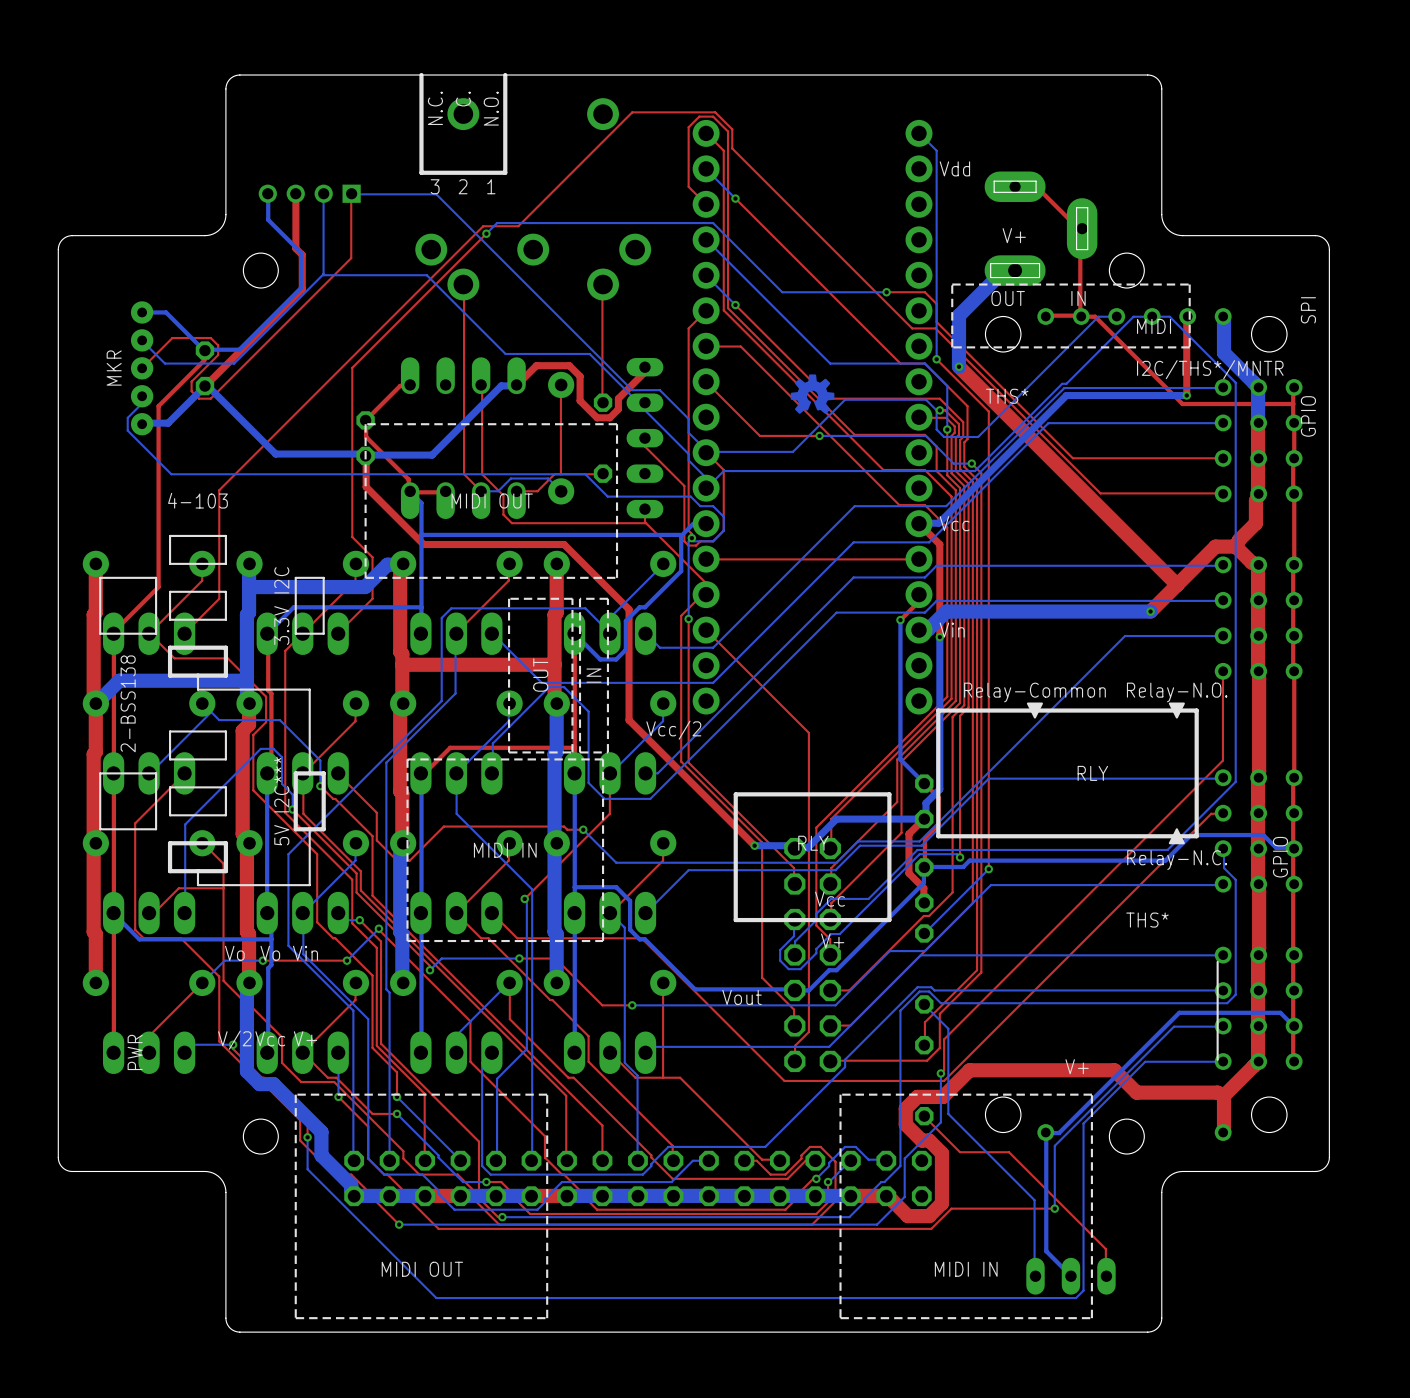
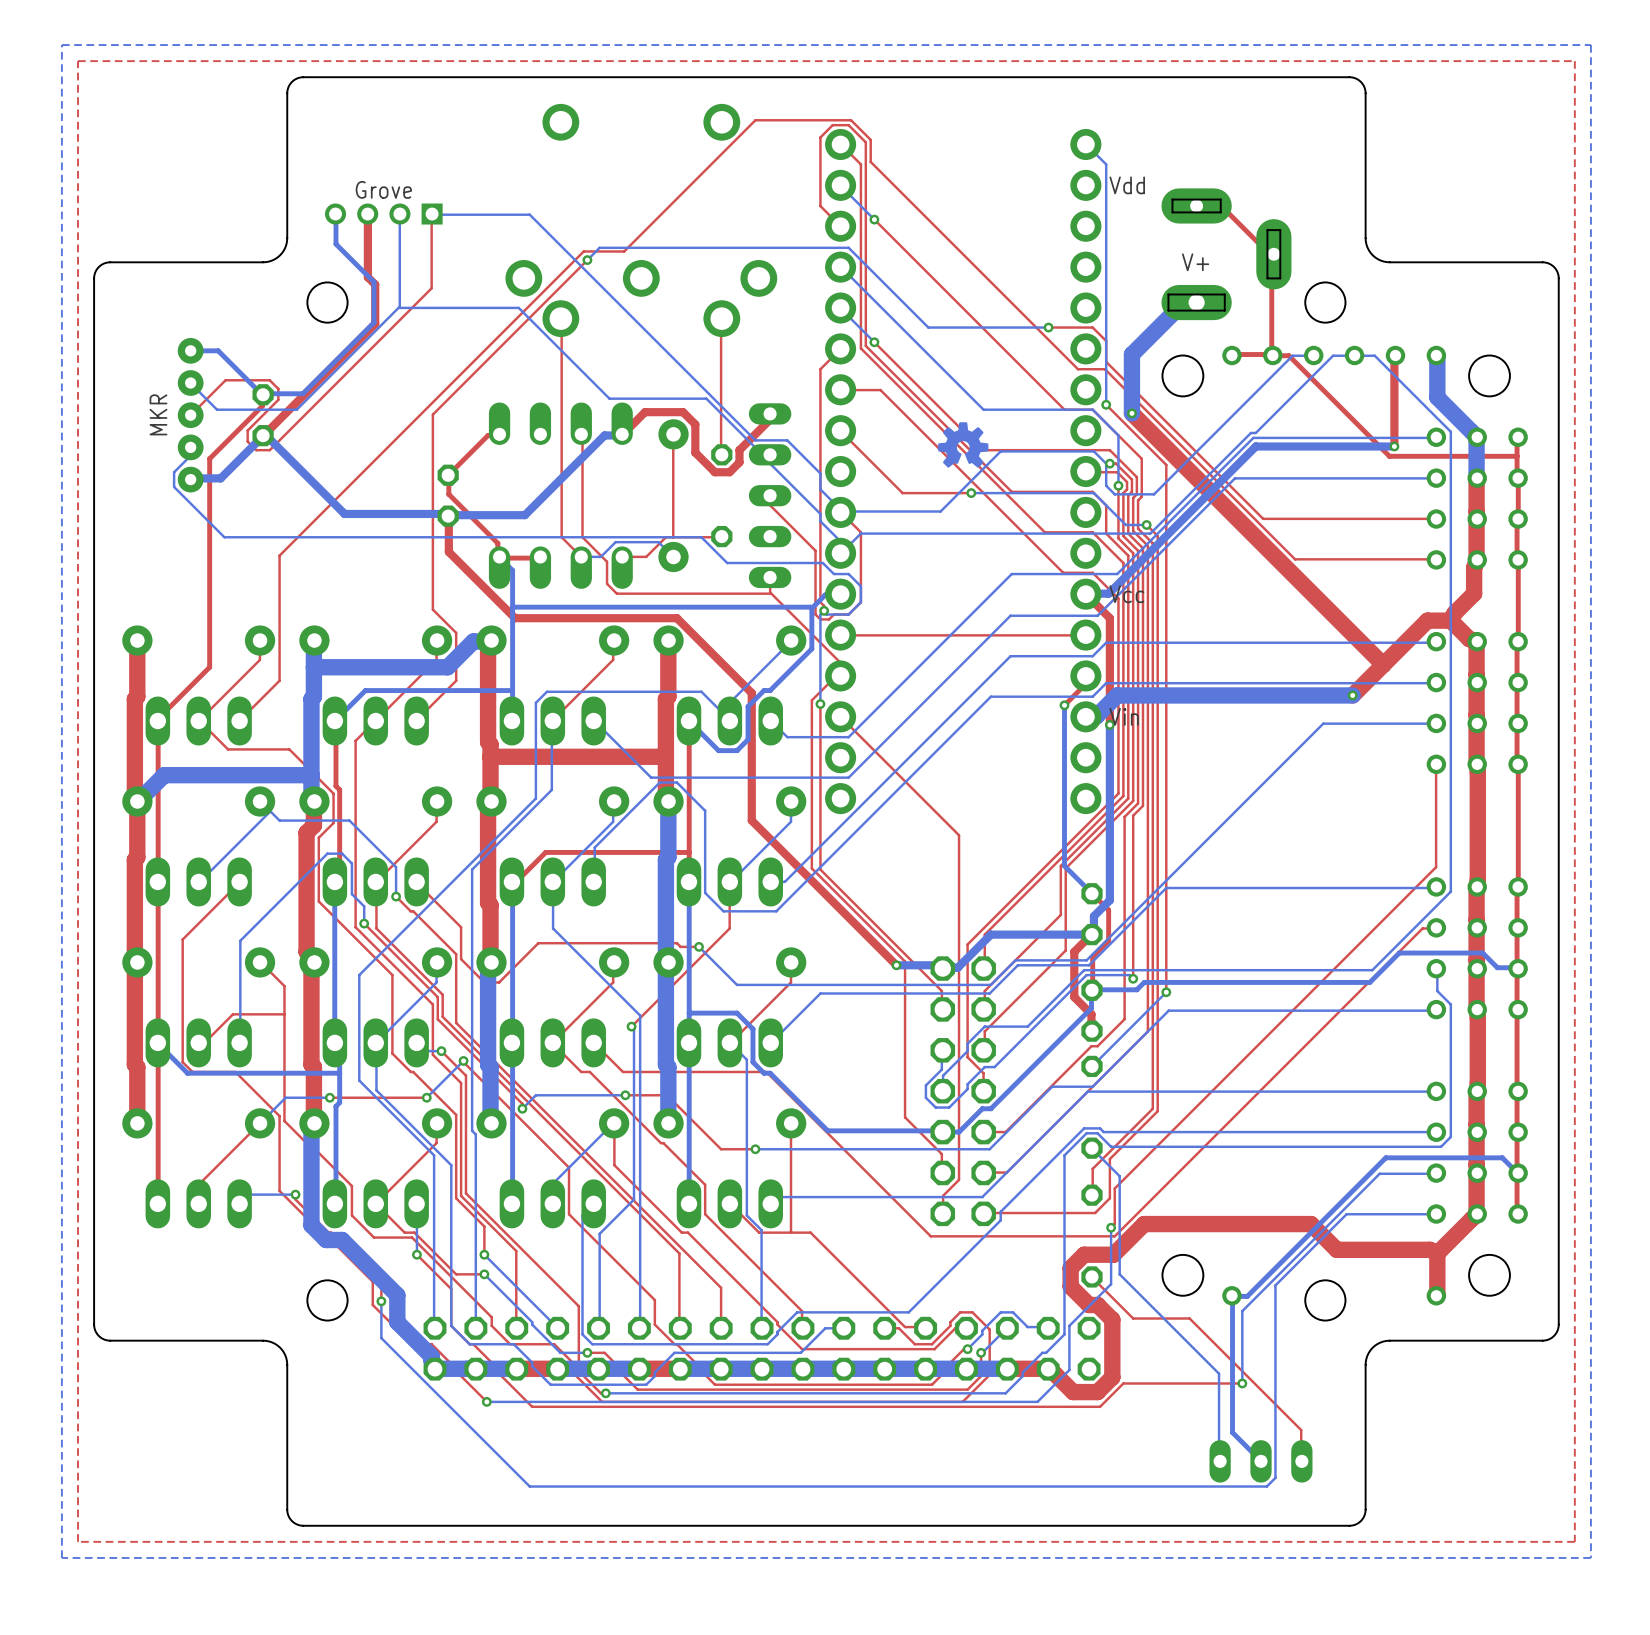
bottom zone outline: none -> (1590, 45) (61, 45) (61, 1557) (1590, 1557) (1590, 45)
top zone outline: none -> (1574, 61) (78, 61) (78, 1541) (1574, 1541) (1574, 61)
line: (505, 75) (505, 172) (421, 172) (421, 75) -> none
text: C. (463, 98) -> none
text: N.C. (435, 108) -> none
text: N.O. (491, 108) -> none
text: none -> Grove (383, 189)
text: 3 (435, 186) -> none
text: 2 (463, 186) -> none
text: 1 (491, 186) -> none
line: (1189, 284) (952, 284) (952, 347) (1189, 347) (1189, 284) -> none
text: OUT (1008, 298) -> none
text: IN (1078, 298) -> none
text: SPI (1308, 310) -> none
text: MIDI (1154, 326) -> none
text: I2C/THS*/MNTR (1210, 369) -> none
text: THS* (1007, 396) -> none
text: GPIO (1308, 416) -> none
line: (617, 424) (365, 424) (365, 577) (617, 577) (617, 424) -> none
text: 4-103 (197, 500) -> none
text: MIDI OUT (492, 501) -> none
line: (225, 535) (170, 535) (170, 563) (225, 563) (225, 535) -> none
line: (156, 577) (100, 577) (100, 633) (156, 633) (156, 577) -> none
line: (323, 577) (295, 577) (295, 633) (323, 633) (323, 577) -> none
line: (225, 591) (225, 619) (170, 619) (170, 591) (225, 591) -> none
line: (572, 598) (509, 598) (509, 752) (572, 752) (572, 598) -> none
line: (607, 598) (580, 598) (580, 752) (607, 752) (607, 598) -> none
text: 3.3V I2C (281, 606) -> none
line: (225, 647) (170, 647) (170, 675) (225, 675) (225, 647) -> none
line: (197, 675) (197, 689) (309, 689) (309, 773) -> none
text: OUT (540, 675) -> none
text: IN (593, 675) -> none
text: Relay-Common (1034, 692) -> none
text: Relay-N.O. (1177, 692) -> none
drawing: [1026, 702, 1043, 719] -> none
drawing: [1168, 702, 1185, 719] -> none
text: 2-BSS138 (128, 703) -> none
line: (1196, 710) (938, 710) (938, 836) (1196, 836) (1196, 710) -> none
text: Vcc/2 (673, 730) -> none
line: (225, 731) (225, 759) (170, 759) (170, 731) (225, 731) -> none
line: (603, 759) (407, 759) (407, 941) (603, 941) (603, 759) -> none
line: (156, 773) (100, 773) (100, 829) (156, 829) (156, 773) -> none
line: (323, 773) (295, 773) (295, 829) (323, 829) (323, 773) -> none
text: RLY (1092, 773) -> none
line: (225, 787) (225, 815) (170, 815) (170, 787) (225, 787) -> none
line: (889, 794) (735, 794) (735, 920) (889, 920) (889, 794) -> none
text: 5V I2C*** (281, 801) -> none
drawing: [1168, 828, 1185, 845] -> none
line: (309, 829) (309, 885) (197, 885) (197, 871) -> none
line: (225, 843) (225, 871) (170, 871) (170, 843) (225, 843) -> none
text: RLY (813, 843) -> none
text: MIDI IN (505, 850) -> none
text: GPIO (1280, 857) -> none
text: Relay-N.C. (1177, 860) -> none
text: Vcc (829, 899) -> none
text: THS* (1147, 920) -> none
text: V+ (832, 941) -> none
text: Vo (234, 953) -> none
text: Vo (270, 953) -> none
text: Vin (305, 953) -> none
line: (1217, 961) (1217, 1059) -> none
text: Vout (742, 997) -> none
text: Vcc (270, 1038) -> none
text: V+ (305, 1038) -> none
text: V/2 (234, 1040) -> none
text: PWR (135, 1052) -> none
text: V+ (1077, 1066) -> none
line: (547, 1094) (547, 1318) (295, 1318) (295, 1094) (547, 1094) -> none
line: (1091, 1094) (840, 1094) (840, 1318) (1091, 1318) (1091, 1094) -> none
text: MIDI OUT (422, 1269) -> none
text: MIDI IN (966, 1269) -> none

